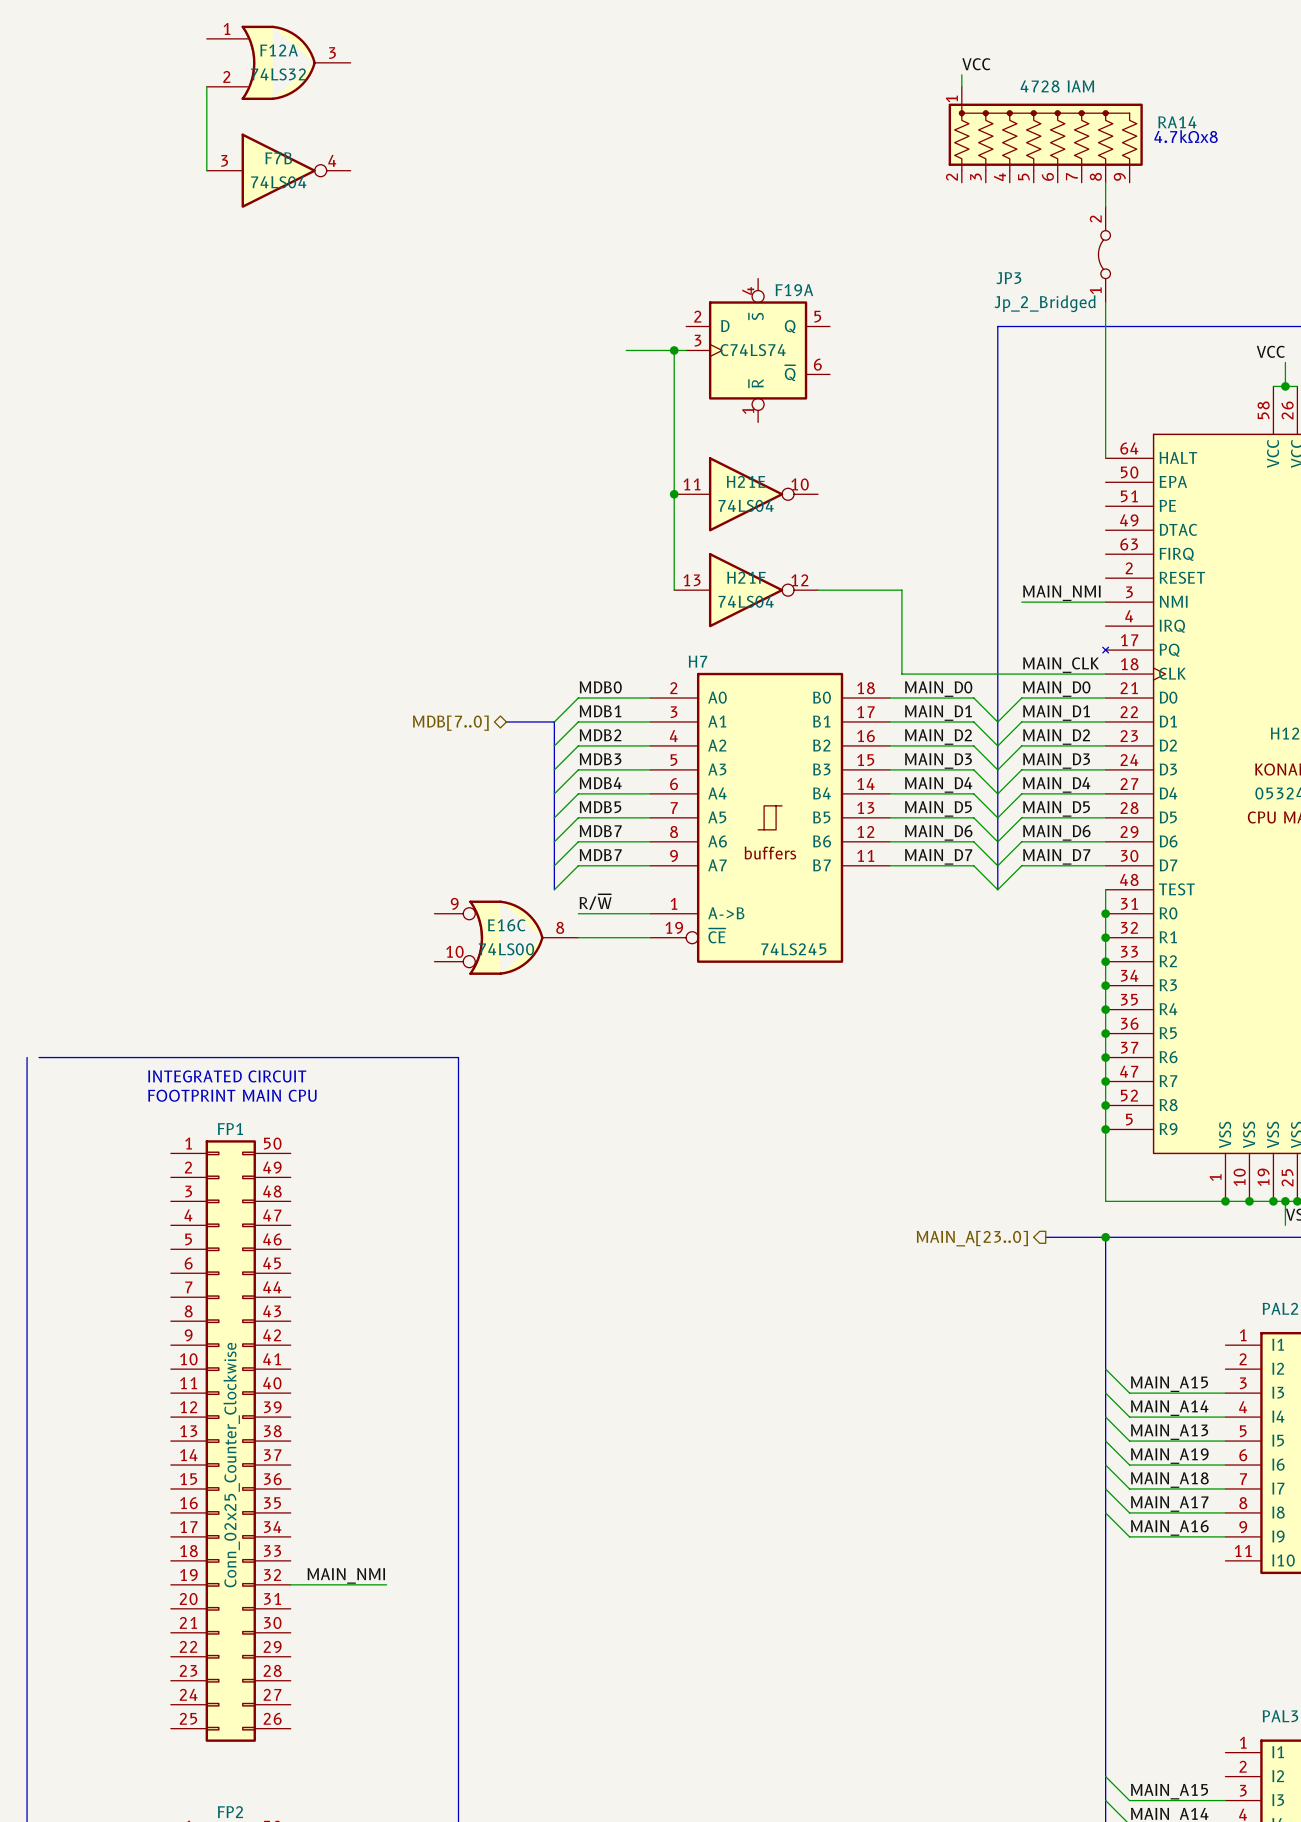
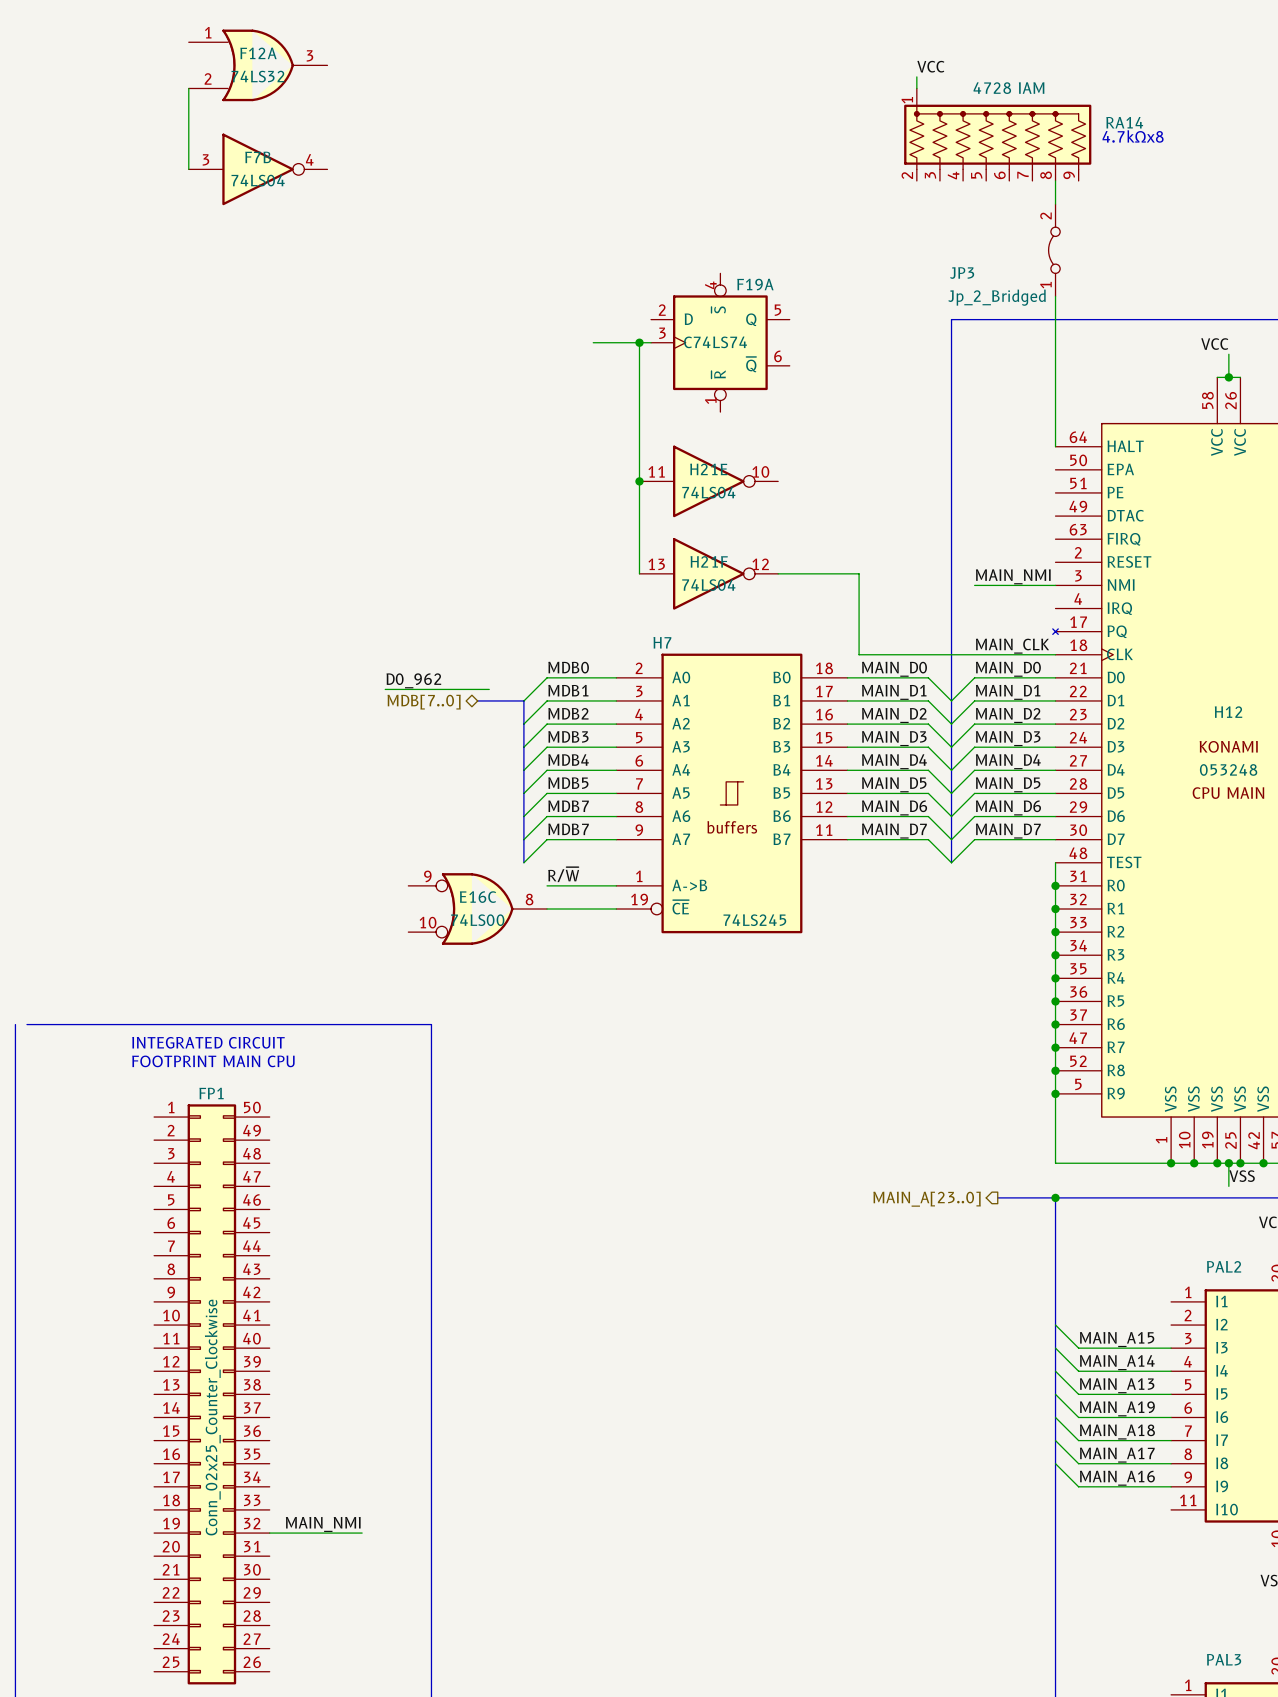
label: none -> D0_962 (413, 680)
wire: none -> (385, 689) (489, 689)

